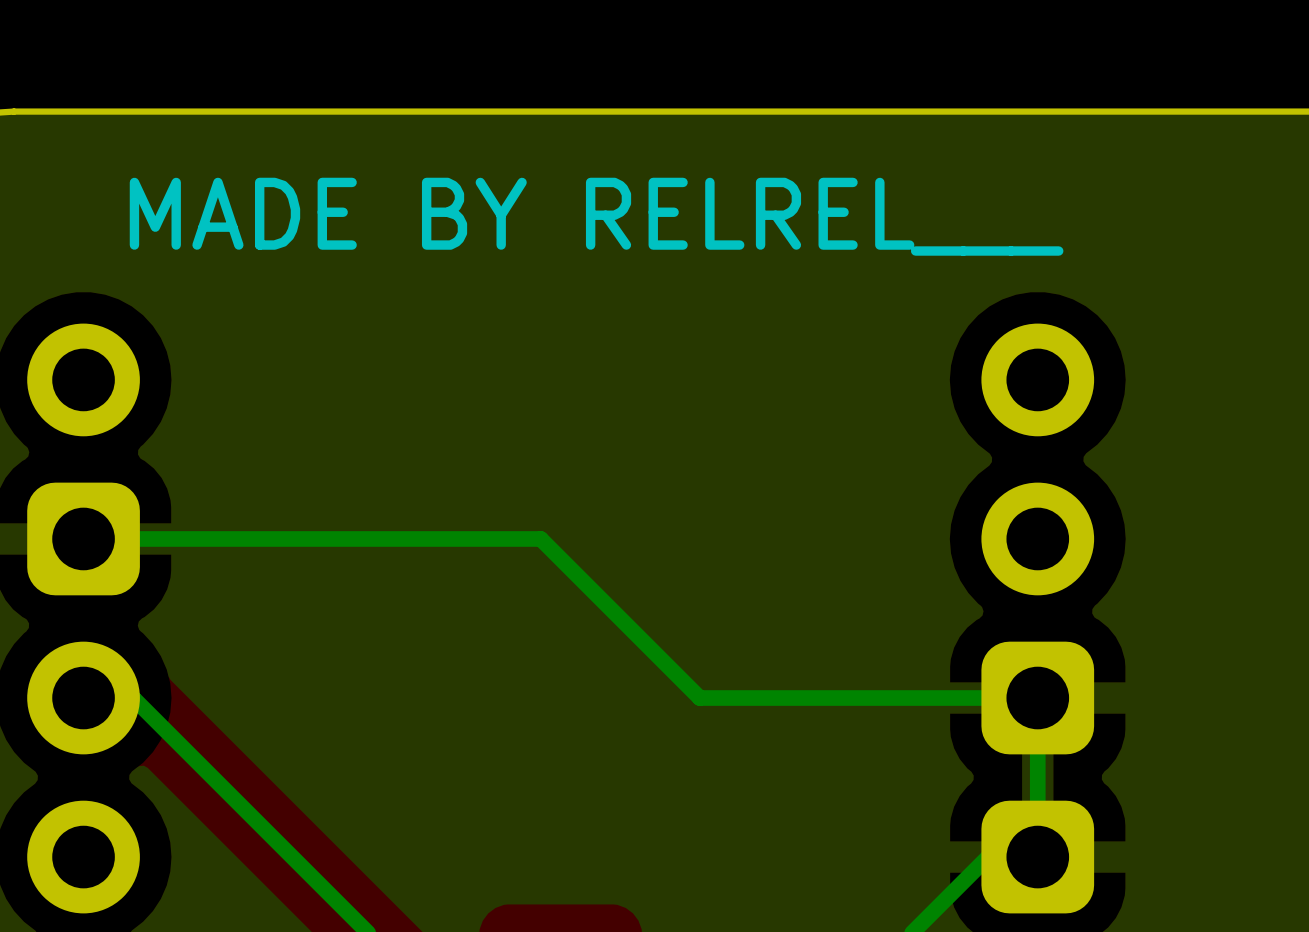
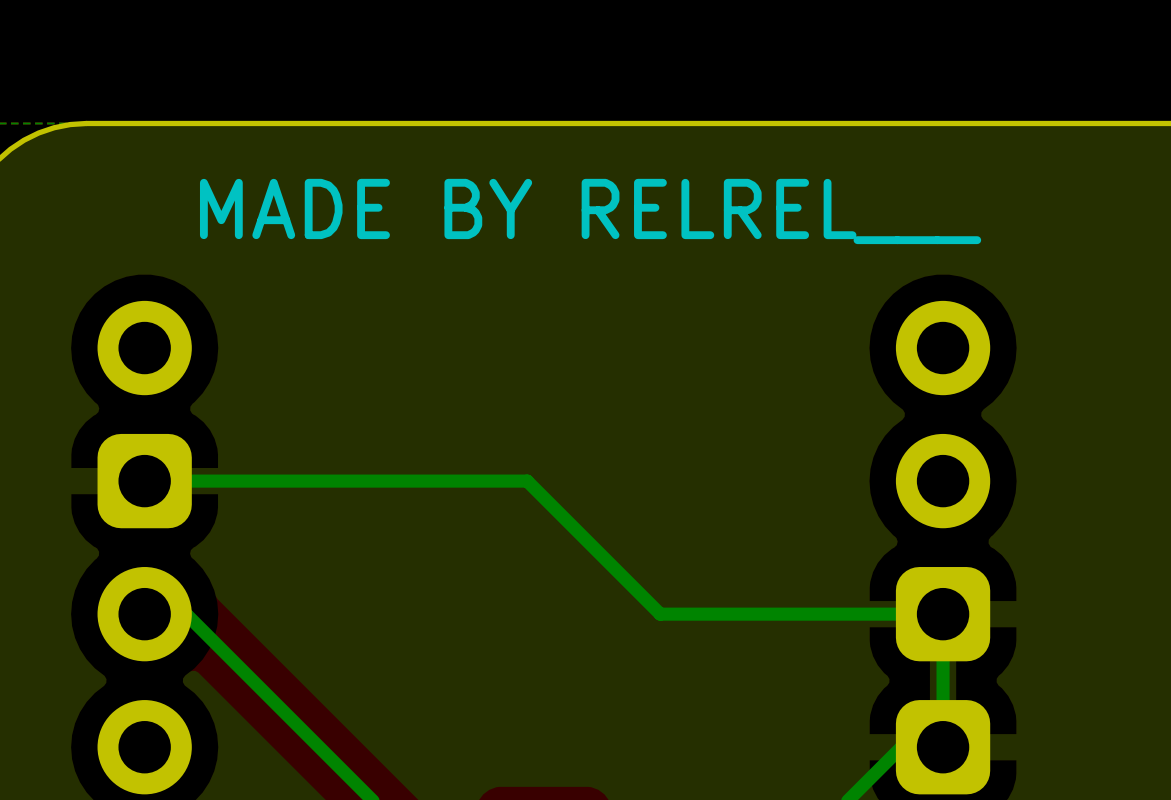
text position: MADE BY RELREL___ (596, 216) -> MADE BY RELREL___ (590, 211)

